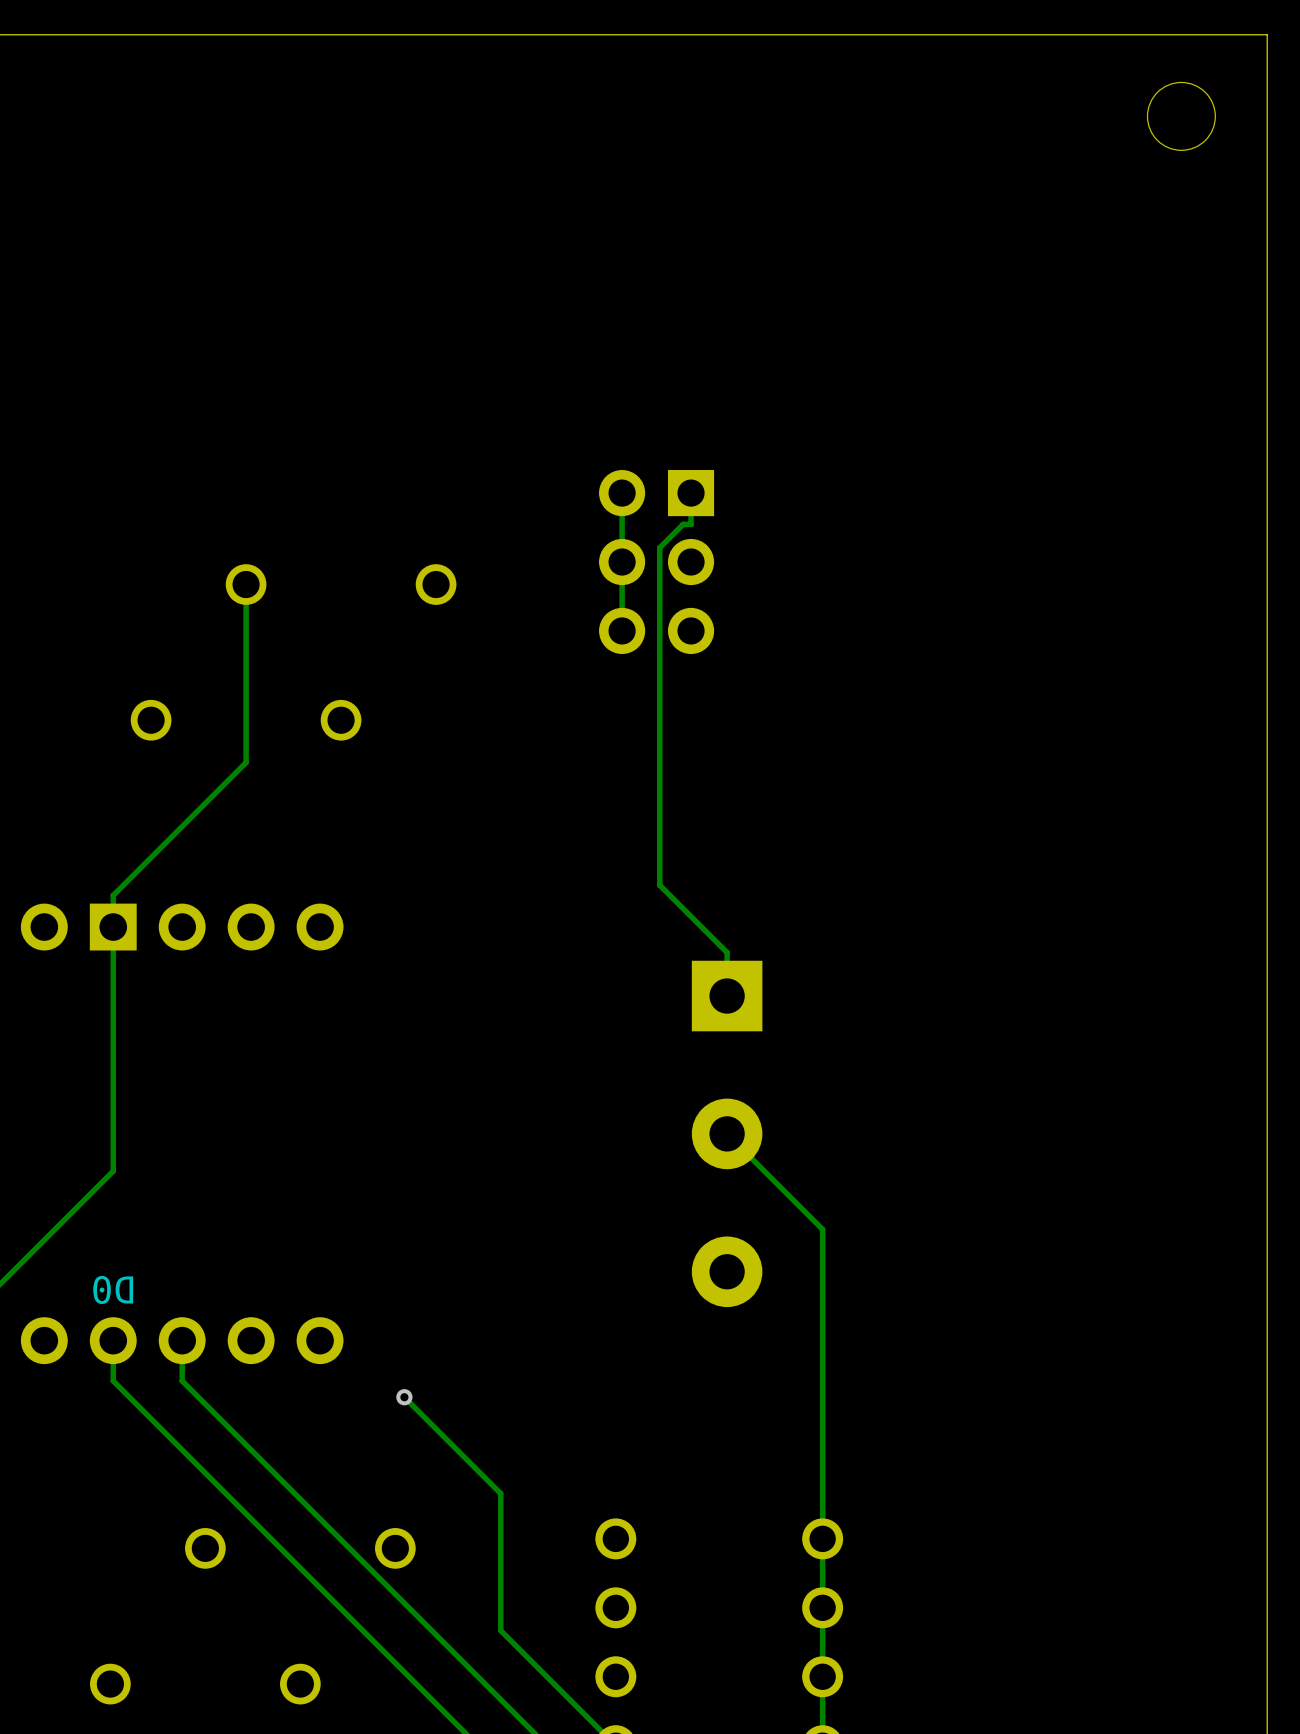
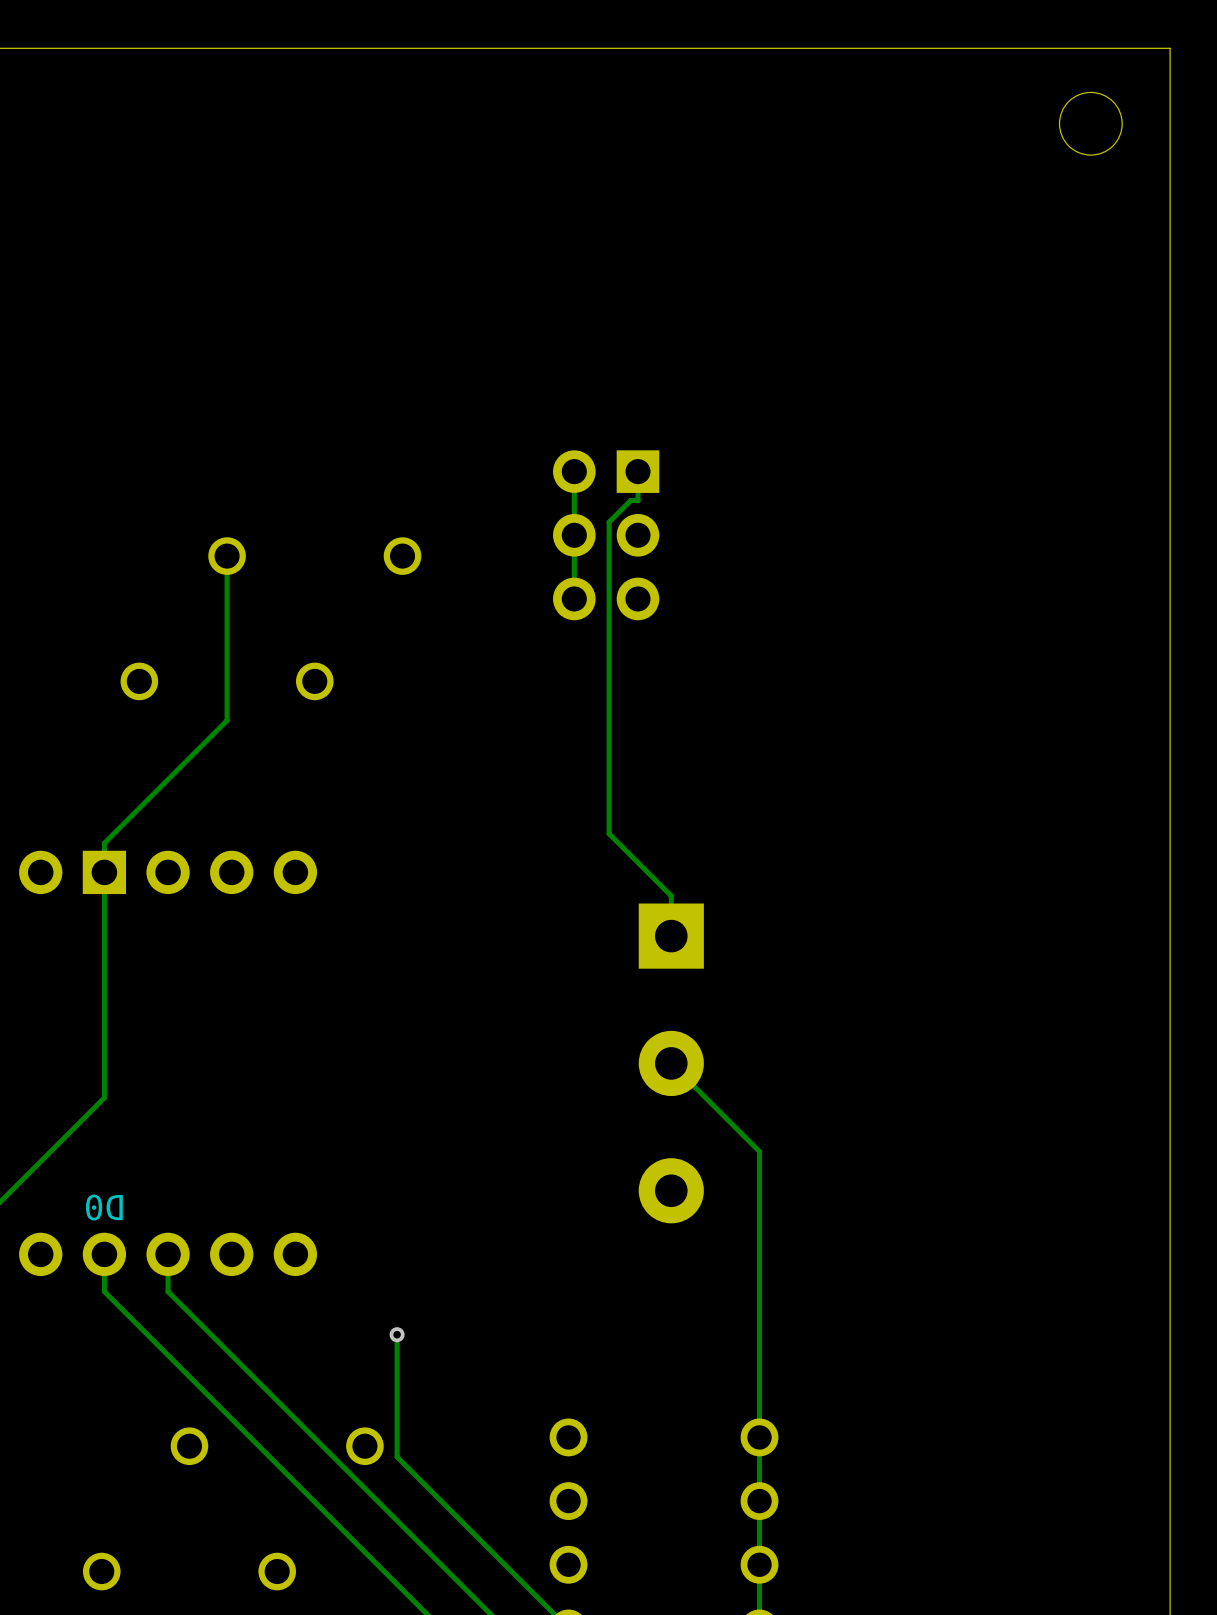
track: (404, 1397) (500, 1493) (500, 1630) -> (397, 1334) (397, 1456) (462, 1522)
via position: (404, 1397) -> (397, 1334)

